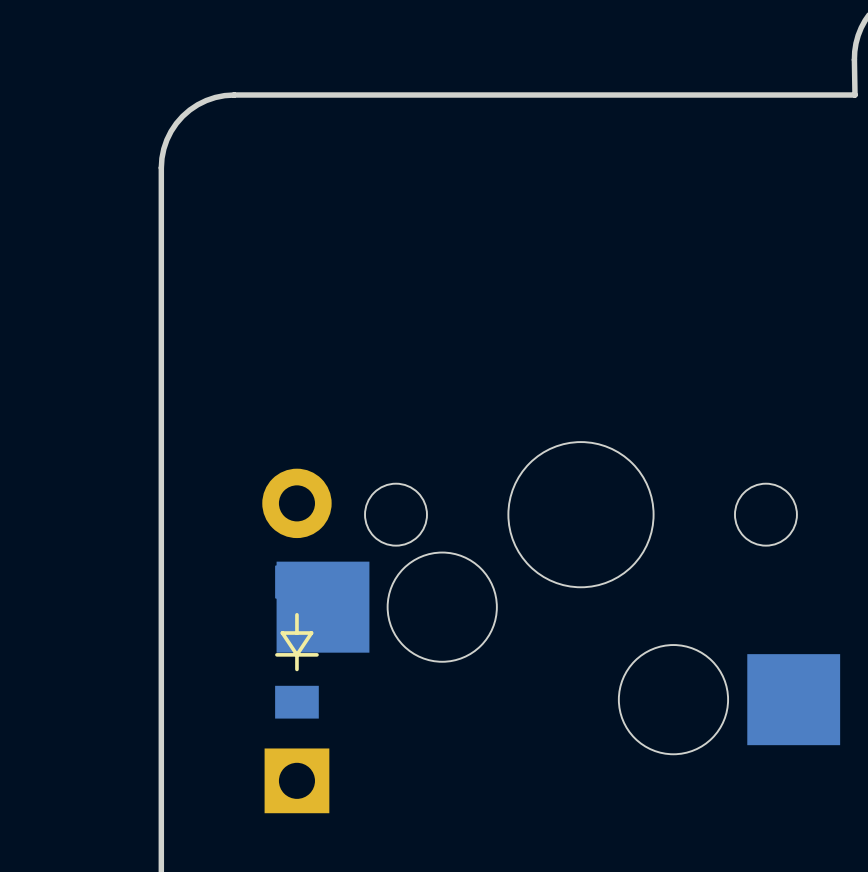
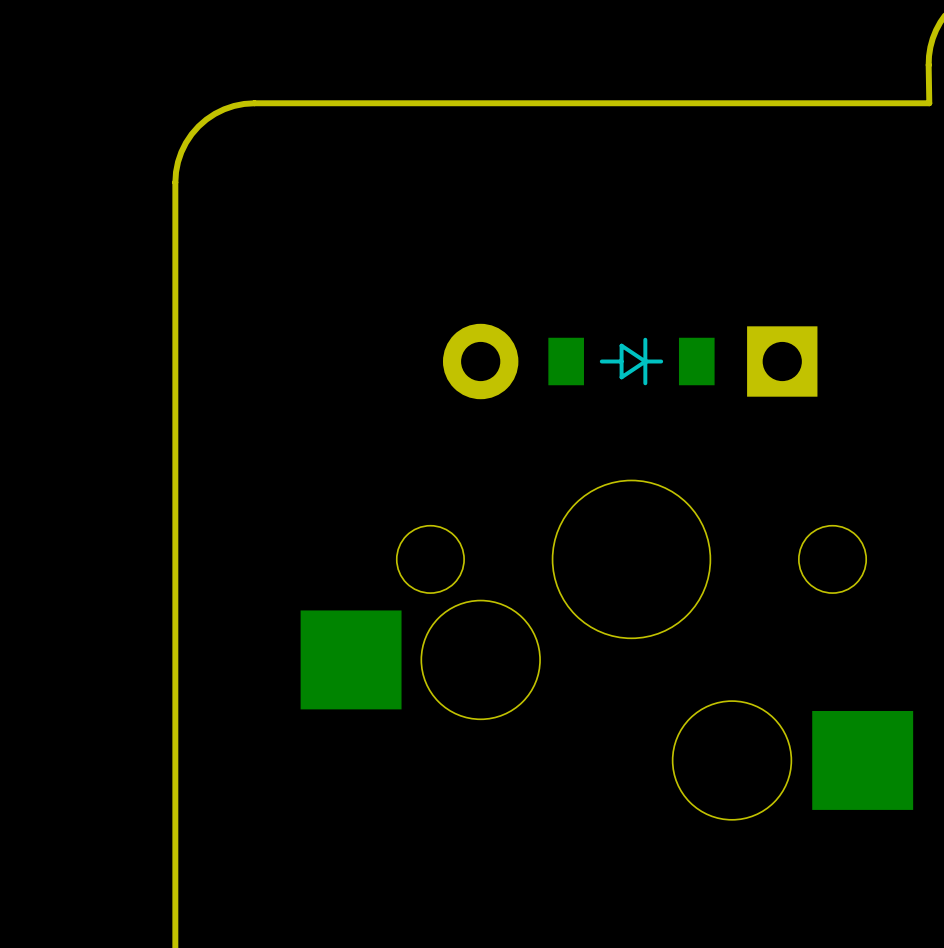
part rotation: 0° (296, 640) -> 90° counterclockwise (630, 361)
part position: (296, 640) -> (630, 361)

